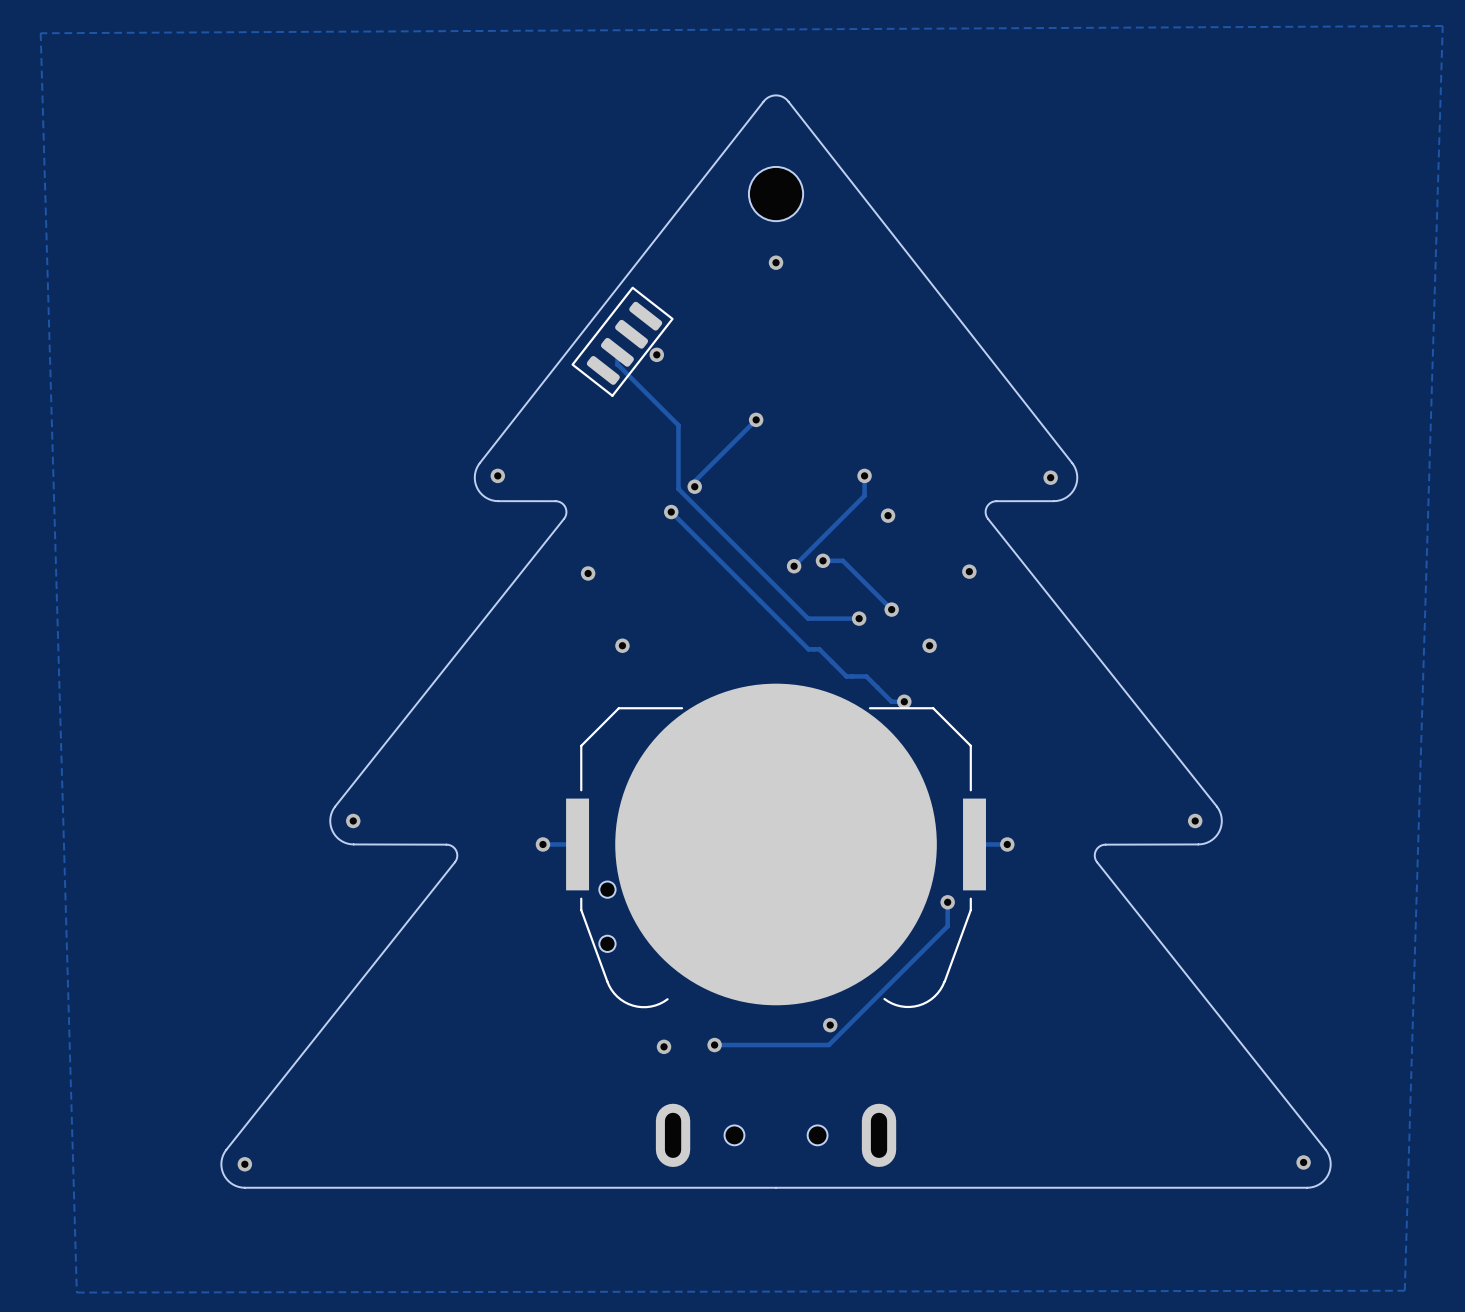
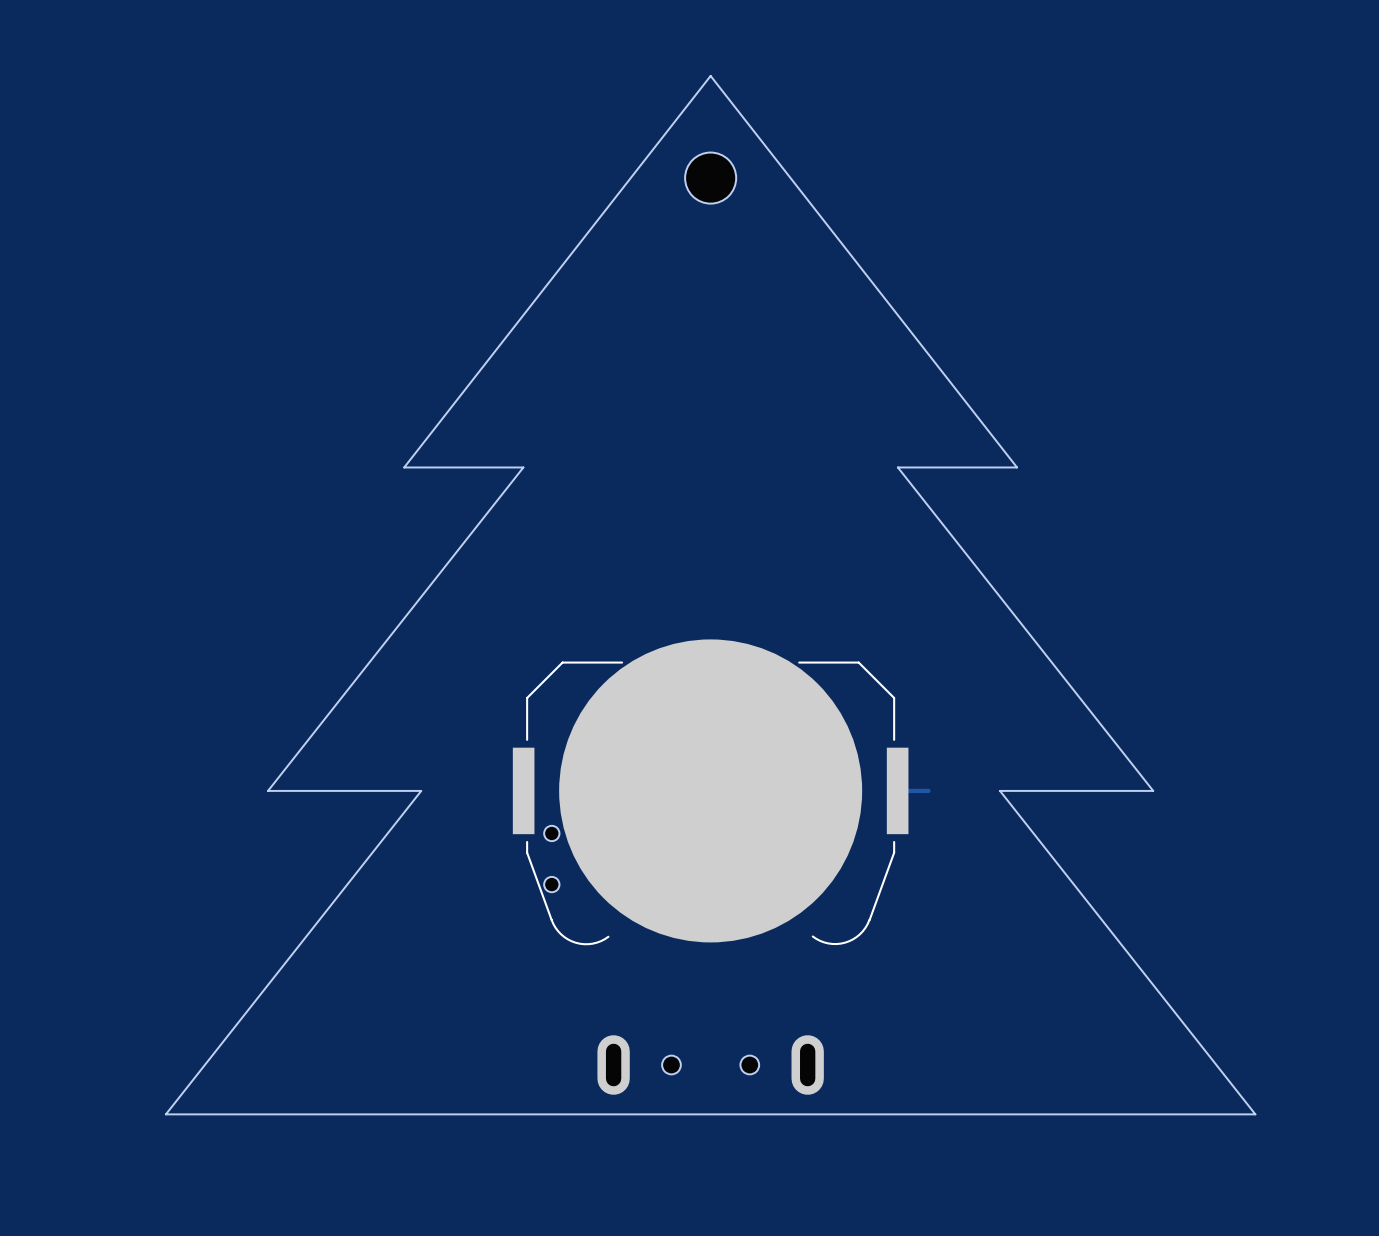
zone outline: (1442, 26) (1404, 1290) (76, 1292) (40, 33) (1442, 26) -> none
via: (776, 262) -> none
part: (622, 341) -> none
track: (617, 352) (617, 364) (678, 425) (678, 488) (808, 618) (859, 618) -> none
via: (656, 354) -> none
track: (756, 419) (694, 481) (694, 486) -> none
via: (756, 419) -> none
via: (497, 475) -> none
track: (864, 475) (864, 495) (794, 566) -> none
via: (864, 475) -> none
via: (1050, 477) -> none
via: (694, 486) -> none
track: (671, 512) (808, 649) (819, 649) (846, 676) (866, 676) (891, 701) (904, 701) -> none
via: (671, 512) -> none
via: (888, 515) -> none
track: (823, 560) (842, 560) (891, 609) -> none
via: (823, 560) -> none
via: (794, 566) -> none
via: (969, 571) -> none
via: (588, 573) -> none
via: (891, 609) -> none
via: (859, 618) -> none
via: (622, 645) -> none
via: (929, 645) -> none
via: (904, 701) -> none
via: (353, 820) -> none
via: (1195, 820) -> none
via: (542, 844) -> none
track: (577, 844) (542, 844) -> none
via: (1007, 844) -> none
track: (947, 902) (947, 926) (828, 1045) (714, 1045) -> none
via: (947, 902) -> none
via: (830, 1025) -> none
via: (714, 1045) -> none
via: (664, 1046) -> none
via: (1303, 1162) -> none
via: (244, 1164) -> none
board edge: (1307, 1187) (1318, 1184) (1326, 1177) (1330, 1166) (1327, 1152) (1095, 858) (1096, 849) (1104, 844) (1204, 843) (1211, 840) (1218, 833) (1221, 819) (1216, 806) (986, 516) (986, 507) (993, 501) (1053, 501) (1064, 498) (1071, 492) (1076, 485) (1077, 476) (1075, 468) (788, 101) (783, 97) (776, 95) (768, 97) (763, 101) (476, 468) (474, 476) (476, 485) (480, 492) (487, 498) (498, 501) (558, 501) (565, 507) (565, 516) (335, 806) (330, 819) (331, 828) (335, 836) (347, 843) (447, 844) (455, 849) (456, 858) (224, 1152) (221, 1163) (225, 1177) (233, 1184) (244, 1187) -> (1211, 1114) (1255, 1114) (1000, 790) (1153, 790) (897, 467) (1017, 467) (710, 75) (404, 467) (523, 467) (268, 790) (421, 790) (165, 1114) (210, 1114)

